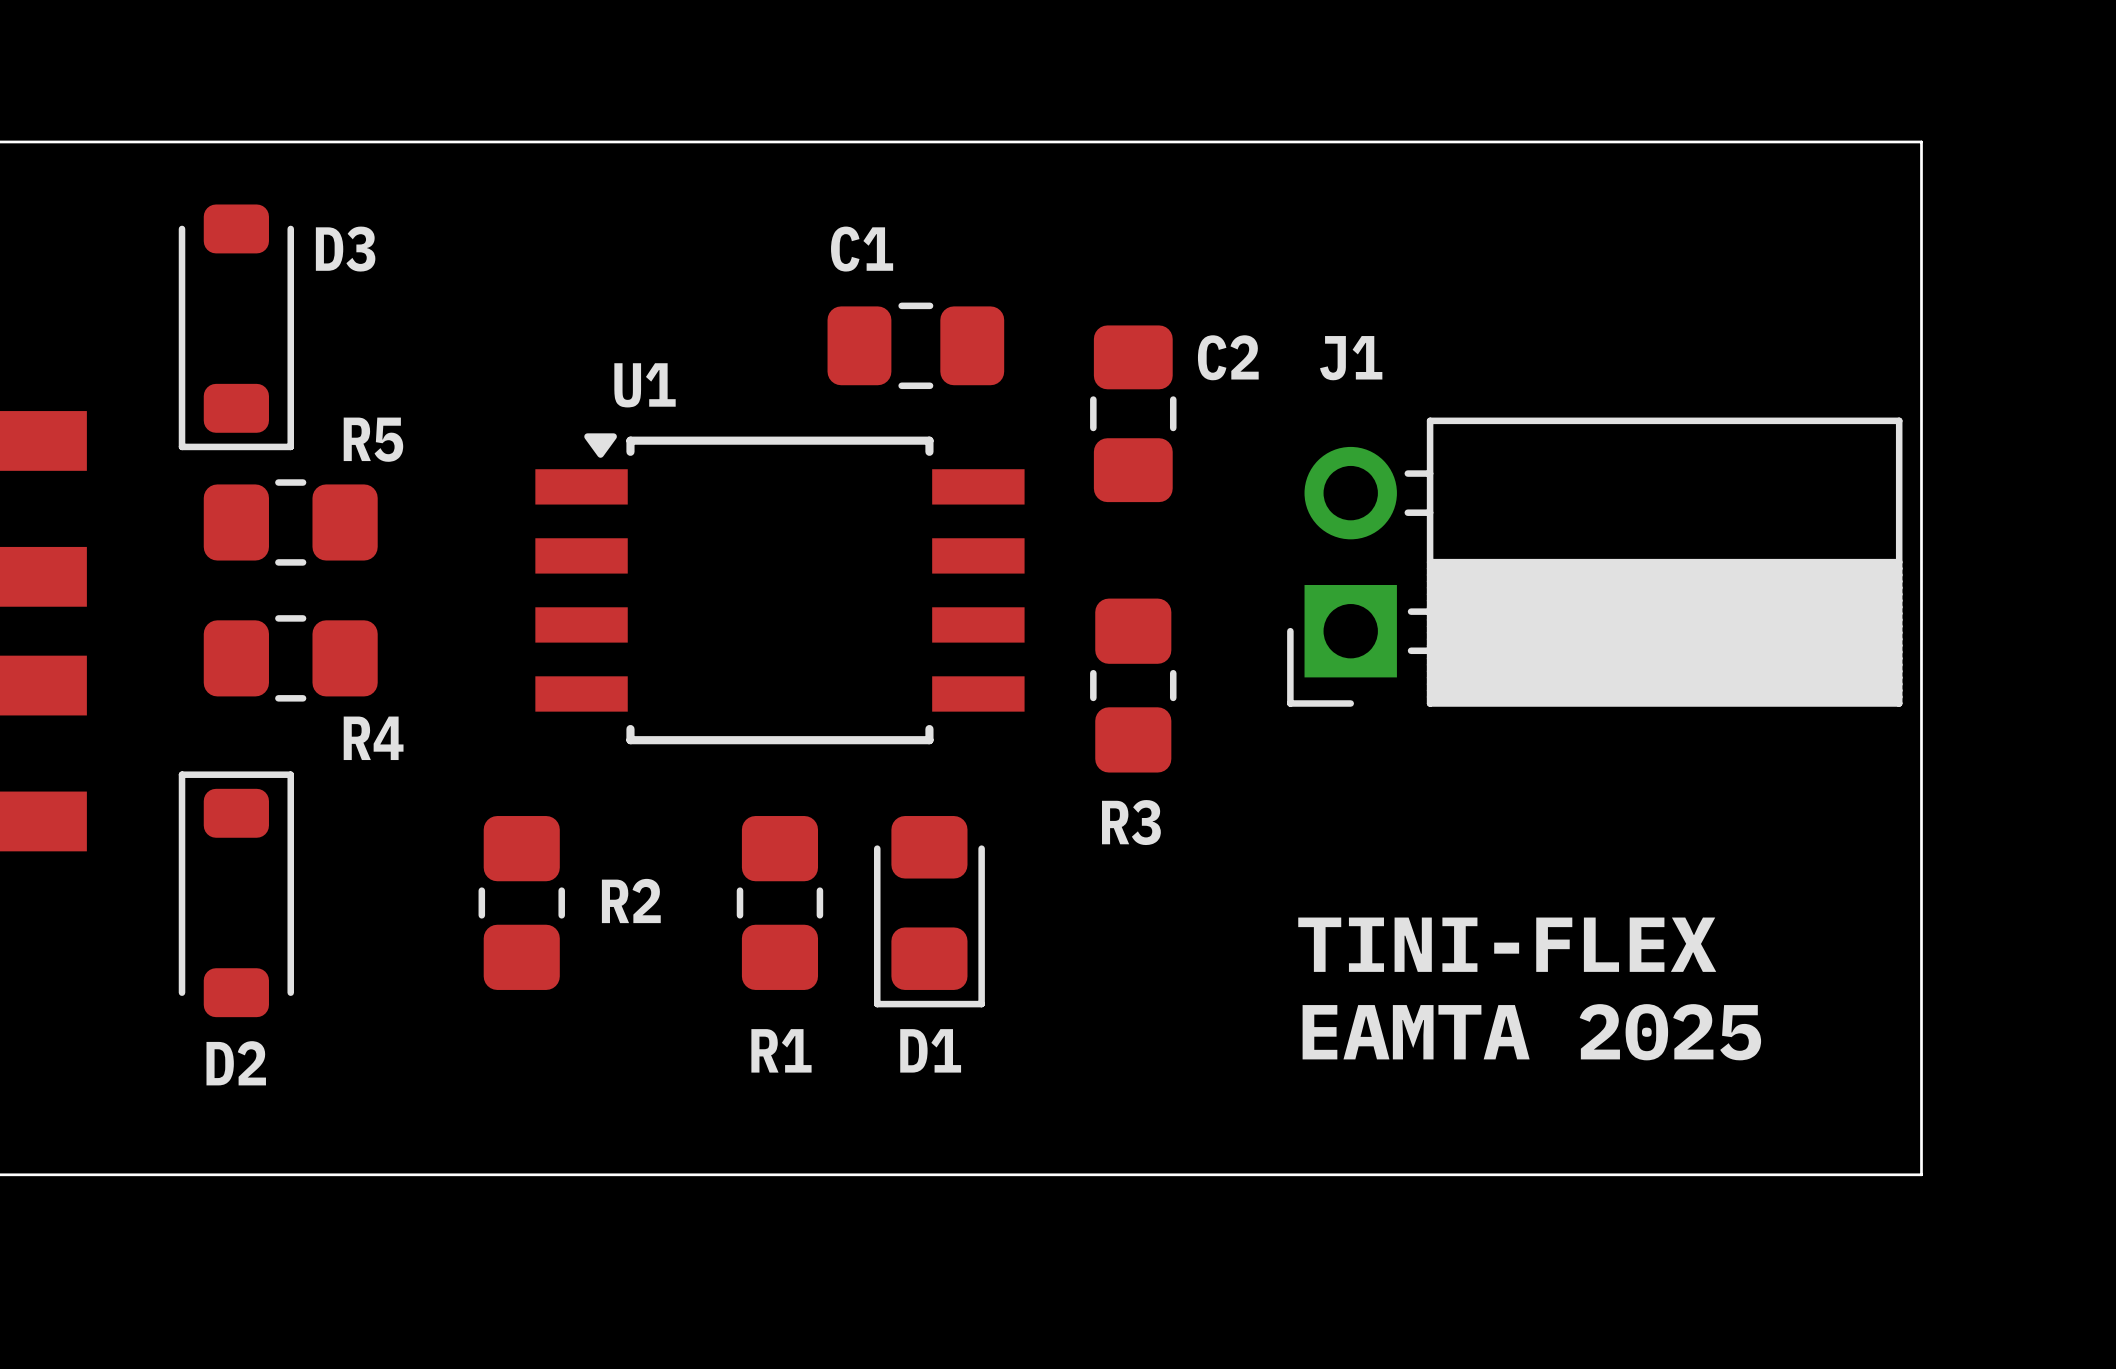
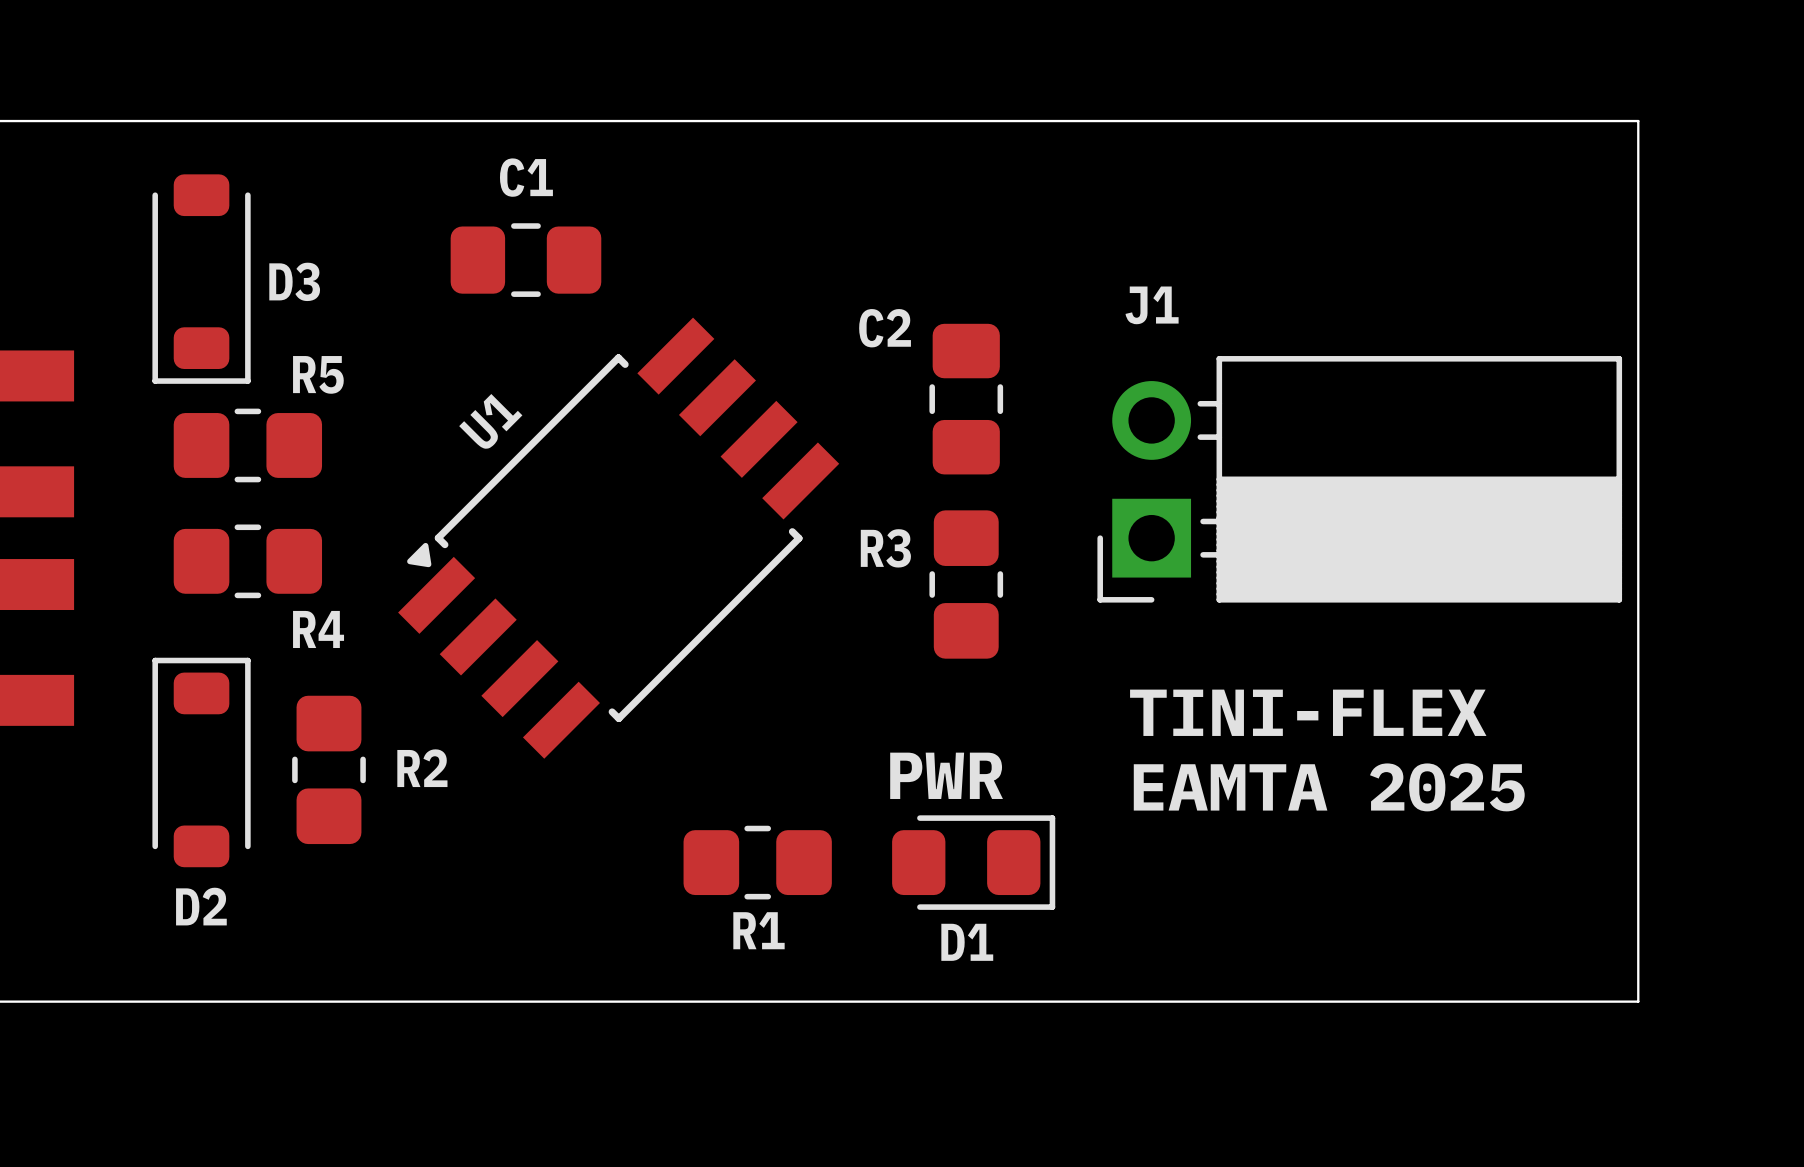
D3 name position: D3 (345, 249) -> D3 (294, 281)
C1 name position: C1 (862, 249) -> C1 (526, 177)
C1 position: (915, 345) -> (525, 260)
C2 name position: C2 (1228, 357) -> C2 (885, 328)
C2 position: (1133, 413) -> (966, 399)
U1 rotation: 0° (779, 588) -> 45° counterclockwise (618, 538)
R3 name position: R3 (1131, 822) -> R3 (885, 548)
R2 position: (521, 902) -> (328, 769)
R1 rotation: 0° (779, 902) -> 90° clockwise (757, 862)
R1 position: (779, 902) -> (757, 862)
text: none -> PWR (946, 775)
D1 rotation: 0° (929, 911) -> 90° counterclockwise (973, 862)
D1 position: (929, 911) -> (973, 862)
text position: TINI-FLEX (1507, 944) -> TINI-FLEX (1308, 712)
text position: EAMTA 2025 (1531, 1032) -> EAMTA 2025 (1329, 787)

